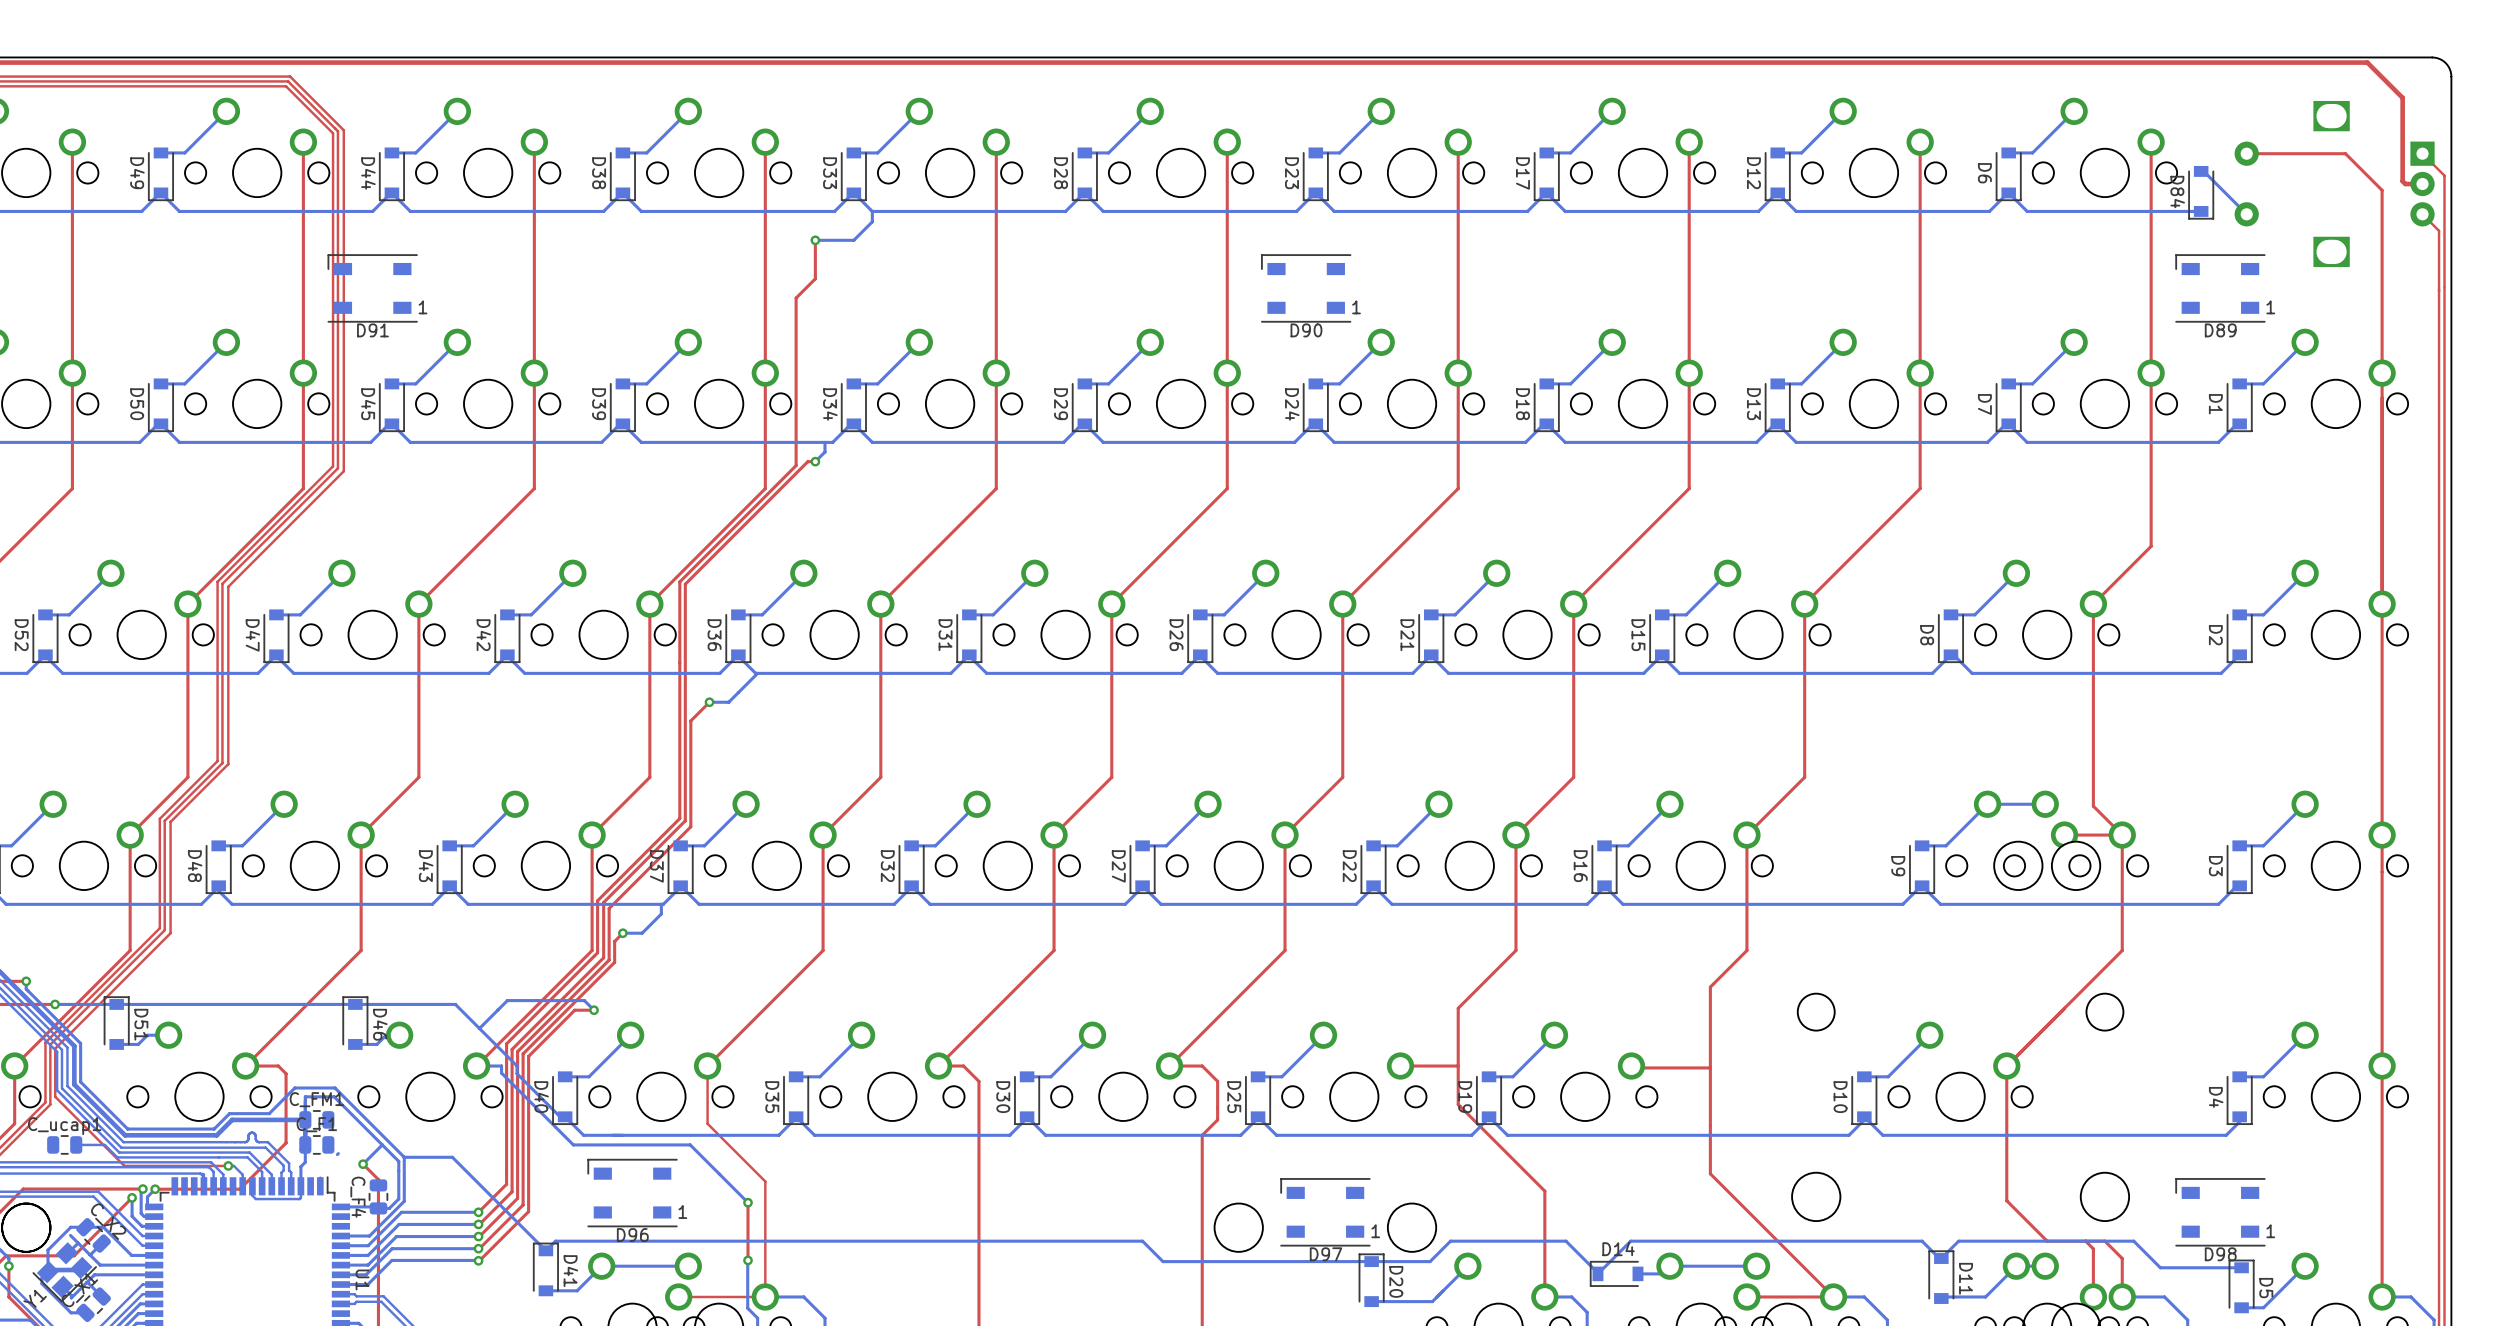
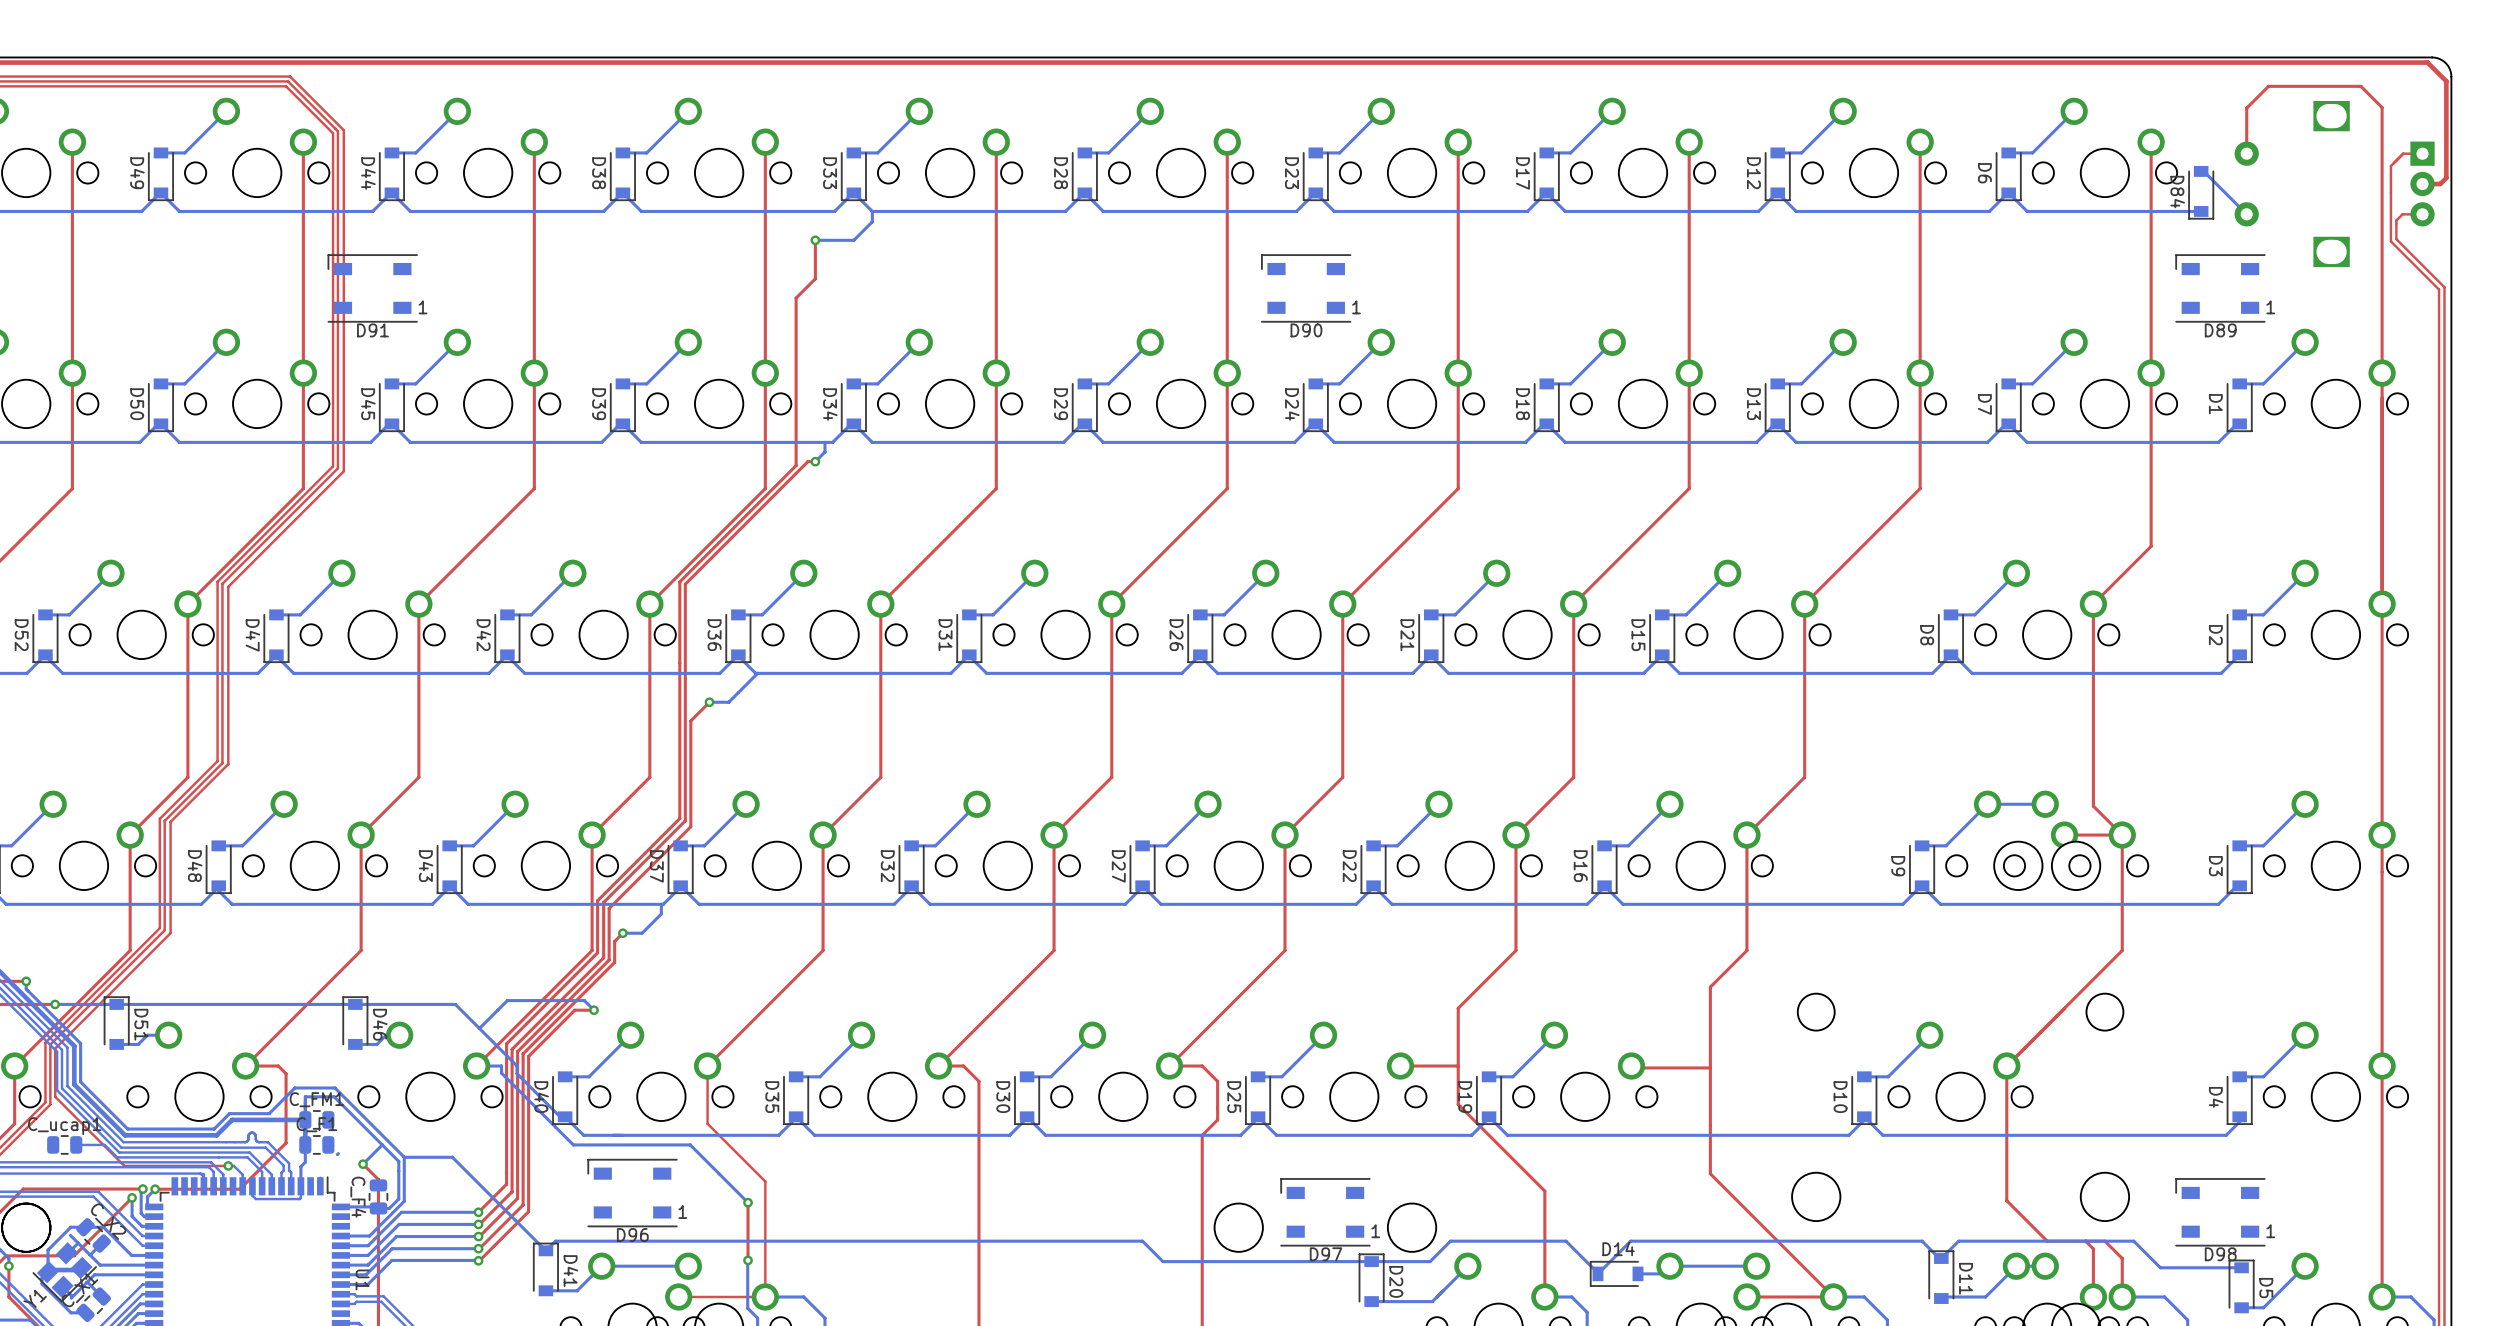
top track: (2367, 62) (2402, 97) (2402, 181) (2405, 184) (2422, 184) -> (2367, 62) (2427, 62) (2446, 81) (2446, 177) (2440, 184) (2422, 184)
top track: (2246, 153) (2345, 153) (2382, 190) -> (2246, 153) (2246, 108) (2268, 86) (2360, 86) (2382, 107) (2382, 190)
top track: (2422, 153) (2444, 175) (2444, 287) -> (2422, 153) (2403, 153) (2390, 166) (2390, 241) (2439, 289)
top track: (2422, 214) (2439, 230) (2439, 291) -> (2422, 214) (2402, 214) (2396, 220) (2396, 239) (2444, 287)

